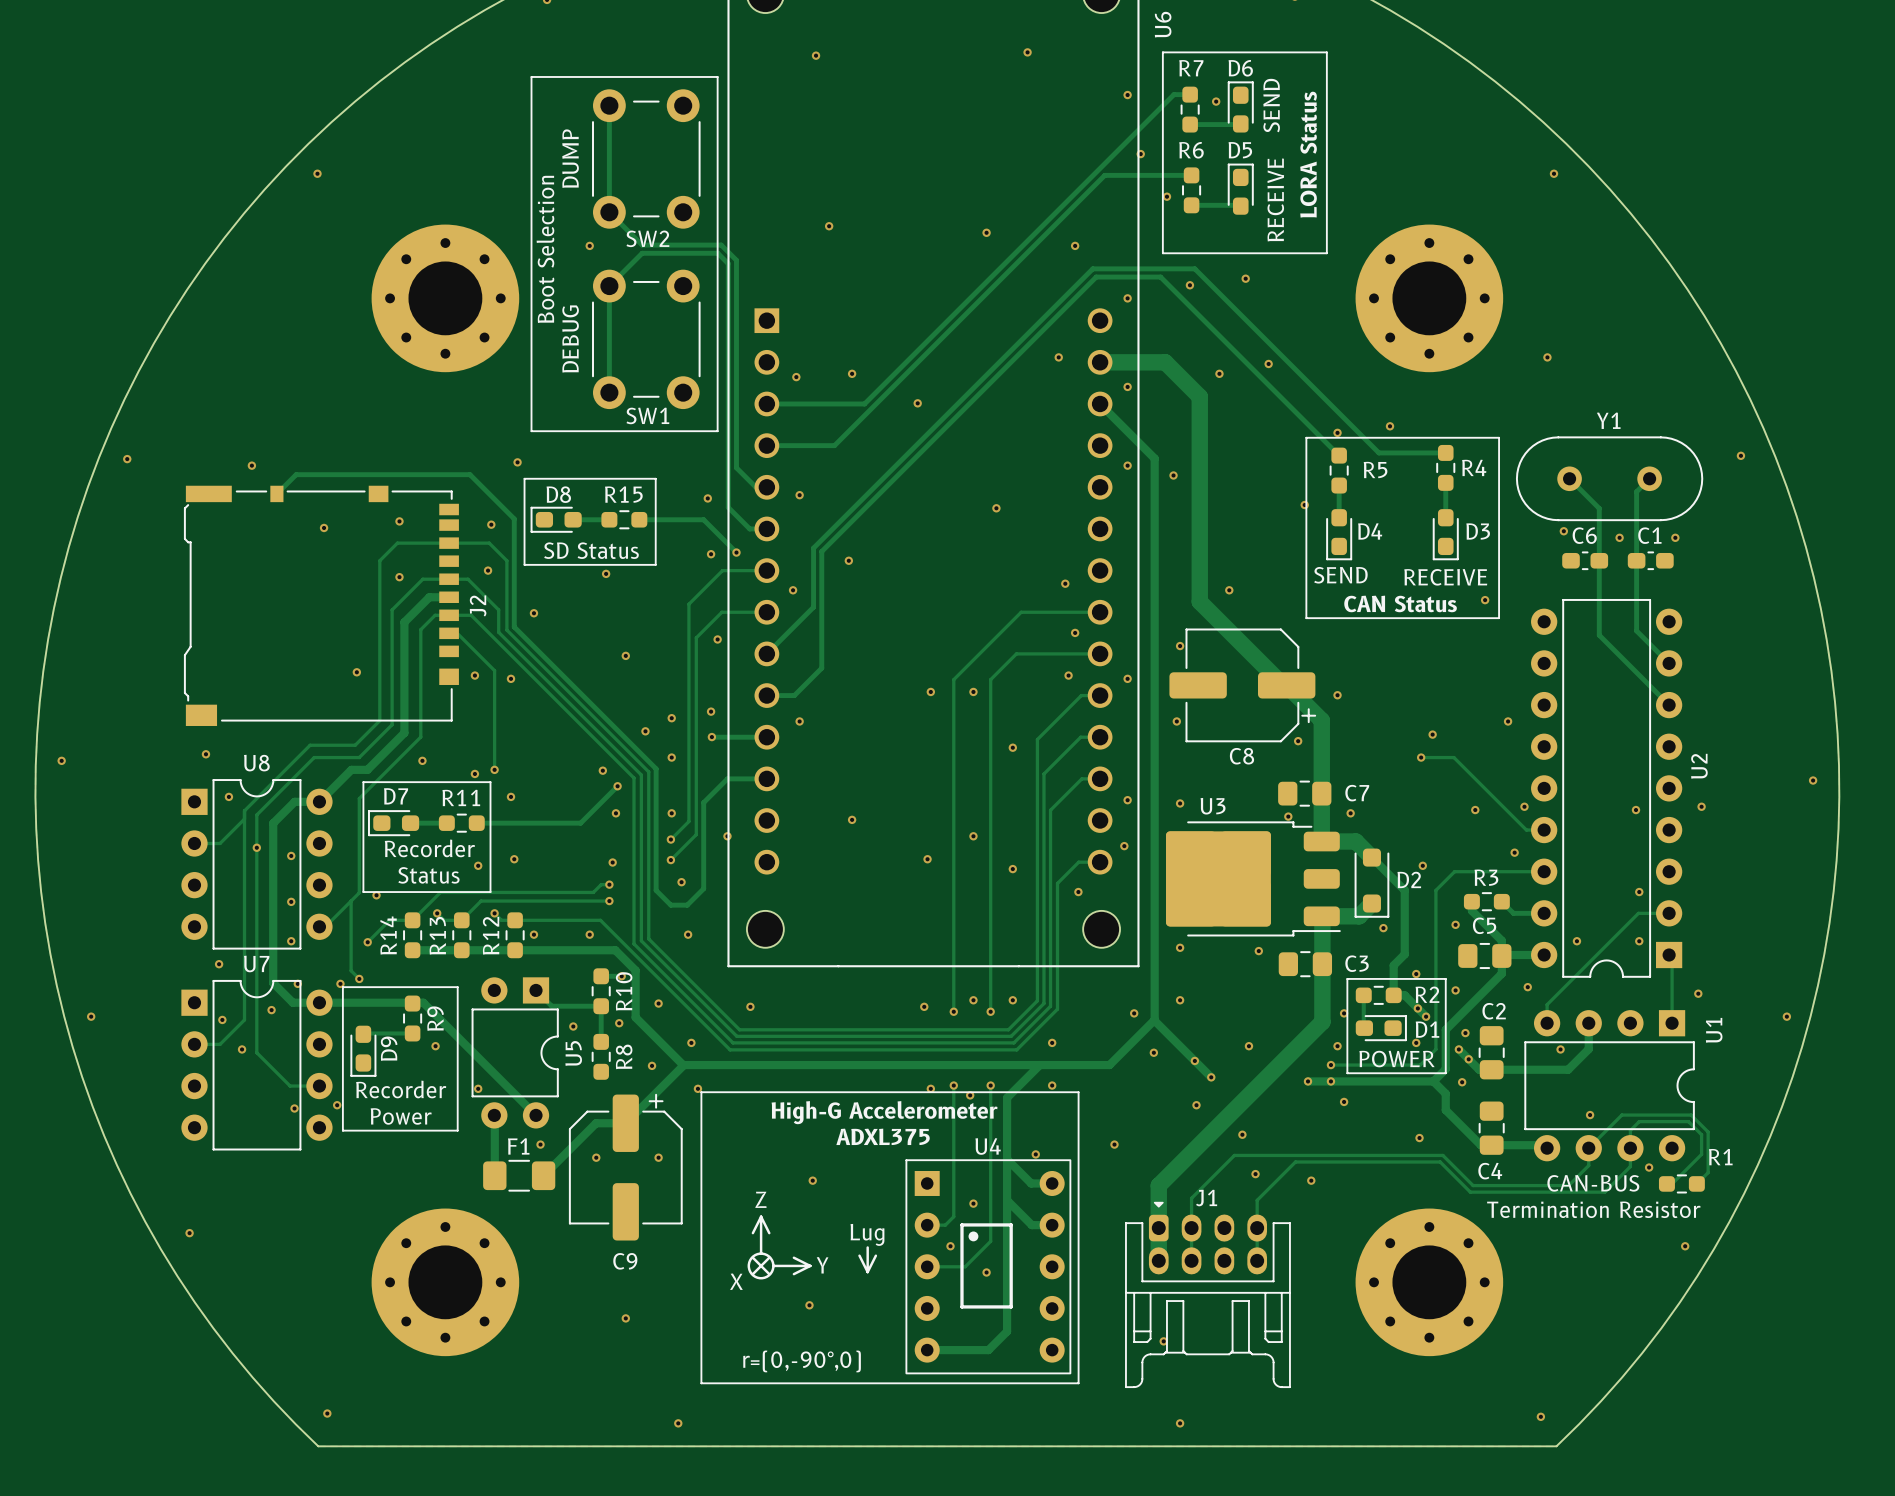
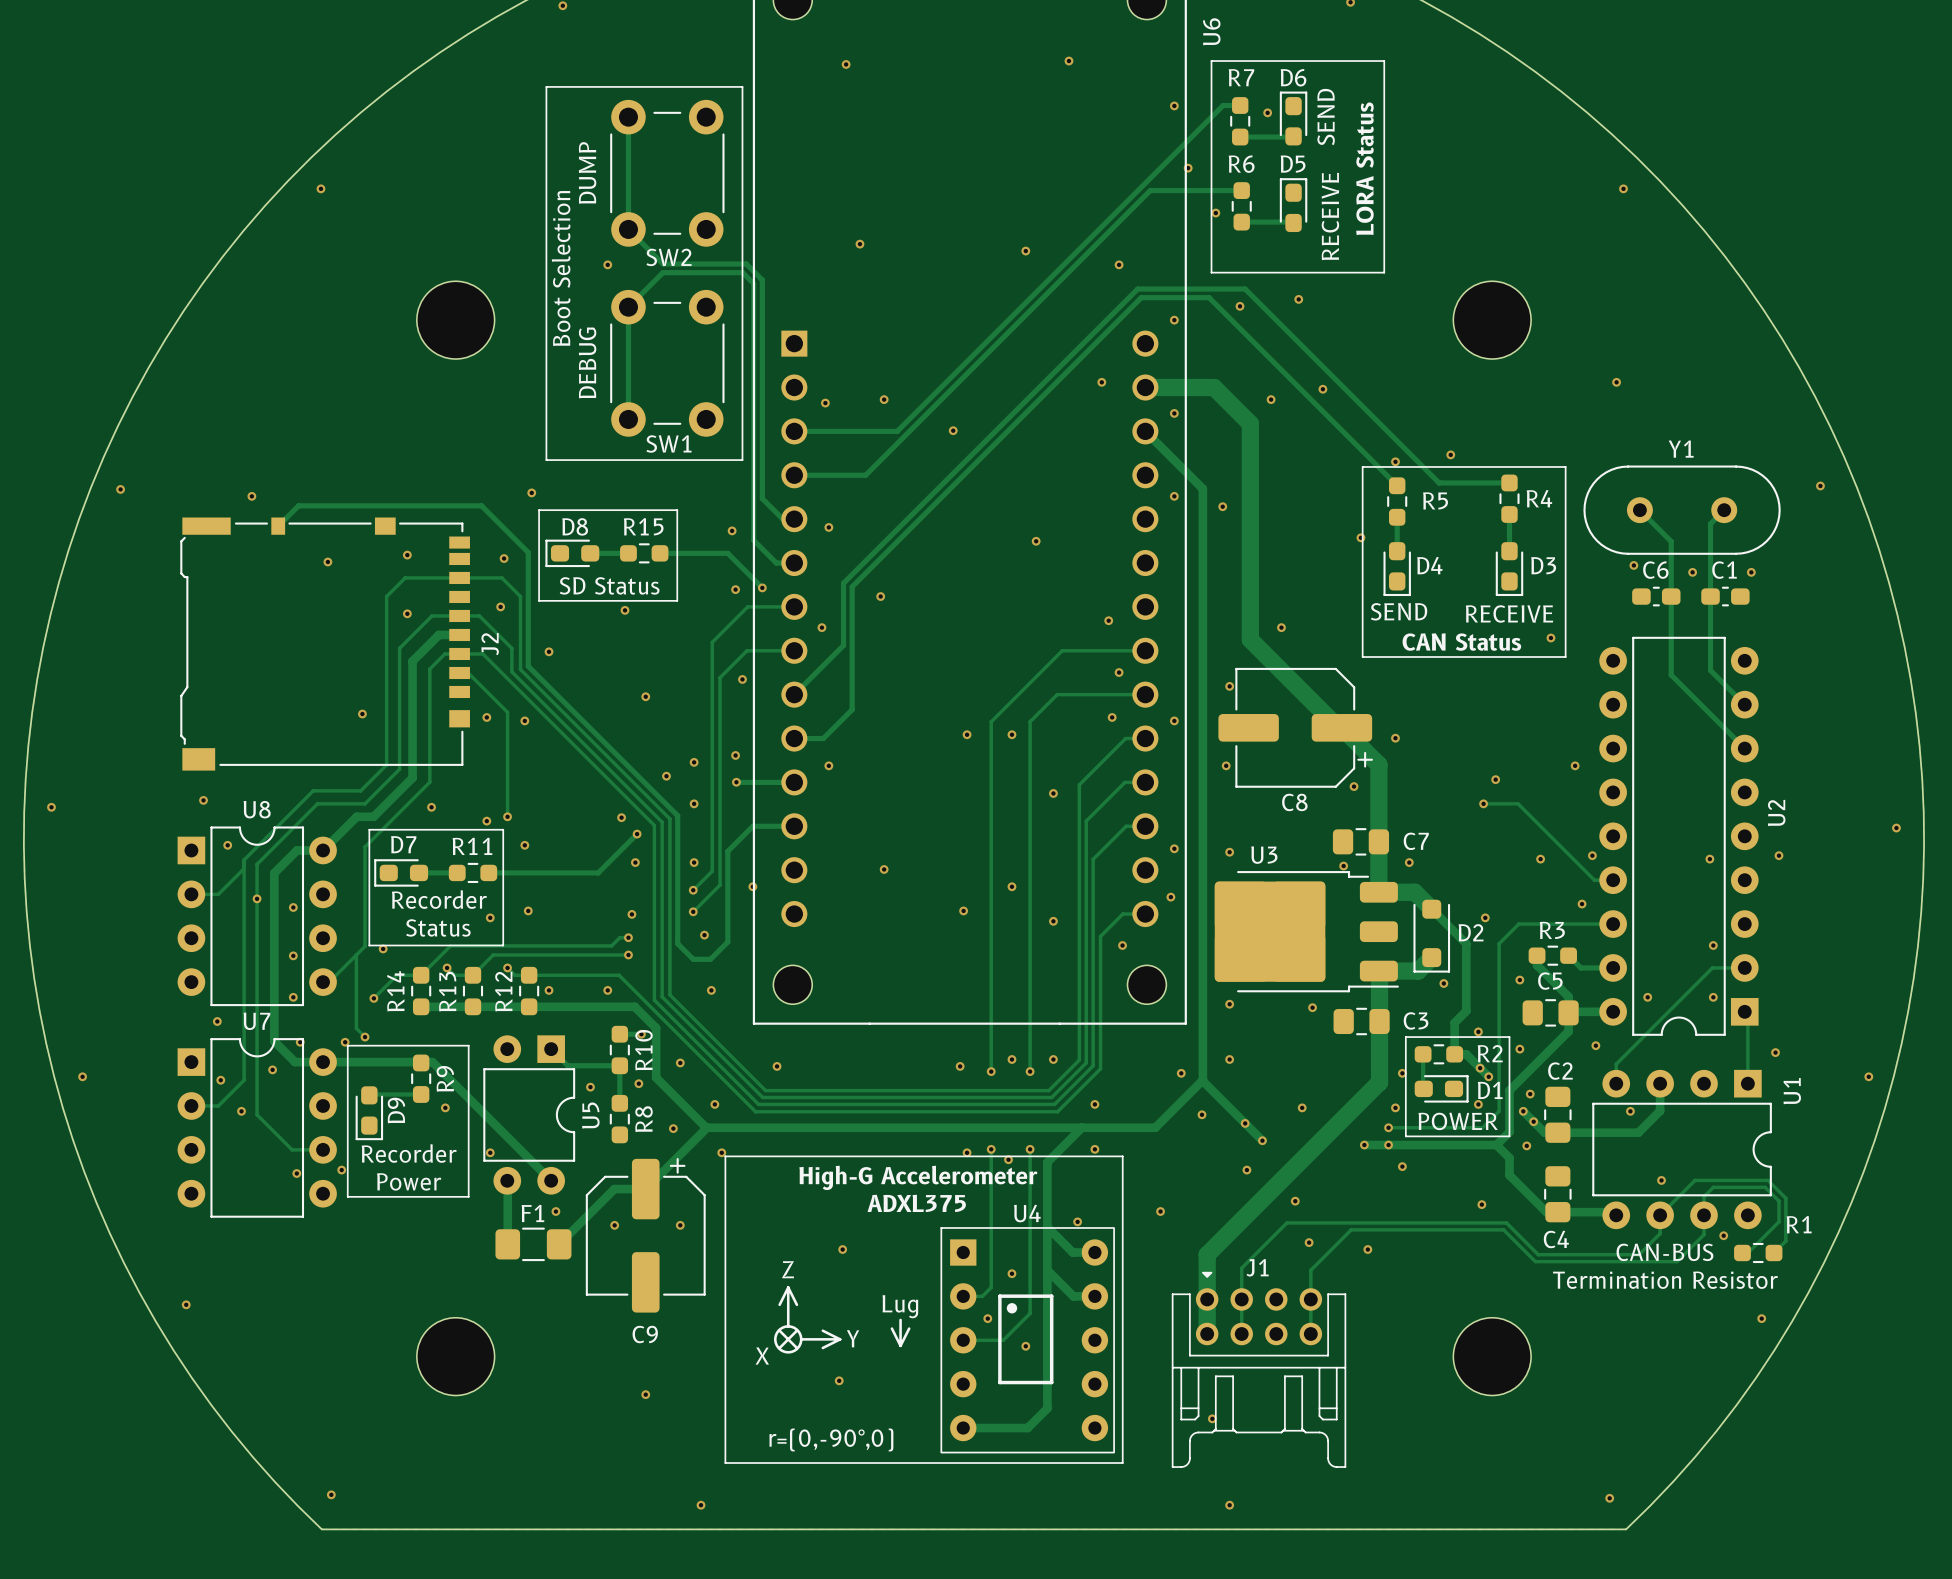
part footprint: [371, 224, 520, 373] -> [416, 281, 495, 360]
part footprint: [1355, 224, 1504, 373] -> [1453, 281, 1532, 360]
J1 footprint: [1125, 1201, 1291, 1388] -> [1171, 1271, 1347, 1468]
part footprint: [371, 1208, 520, 1357] -> [416, 1317, 495, 1396]
part footprint: [1355, 1208, 1504, 1357] -> [1453, 1317, 1532, 1396]

